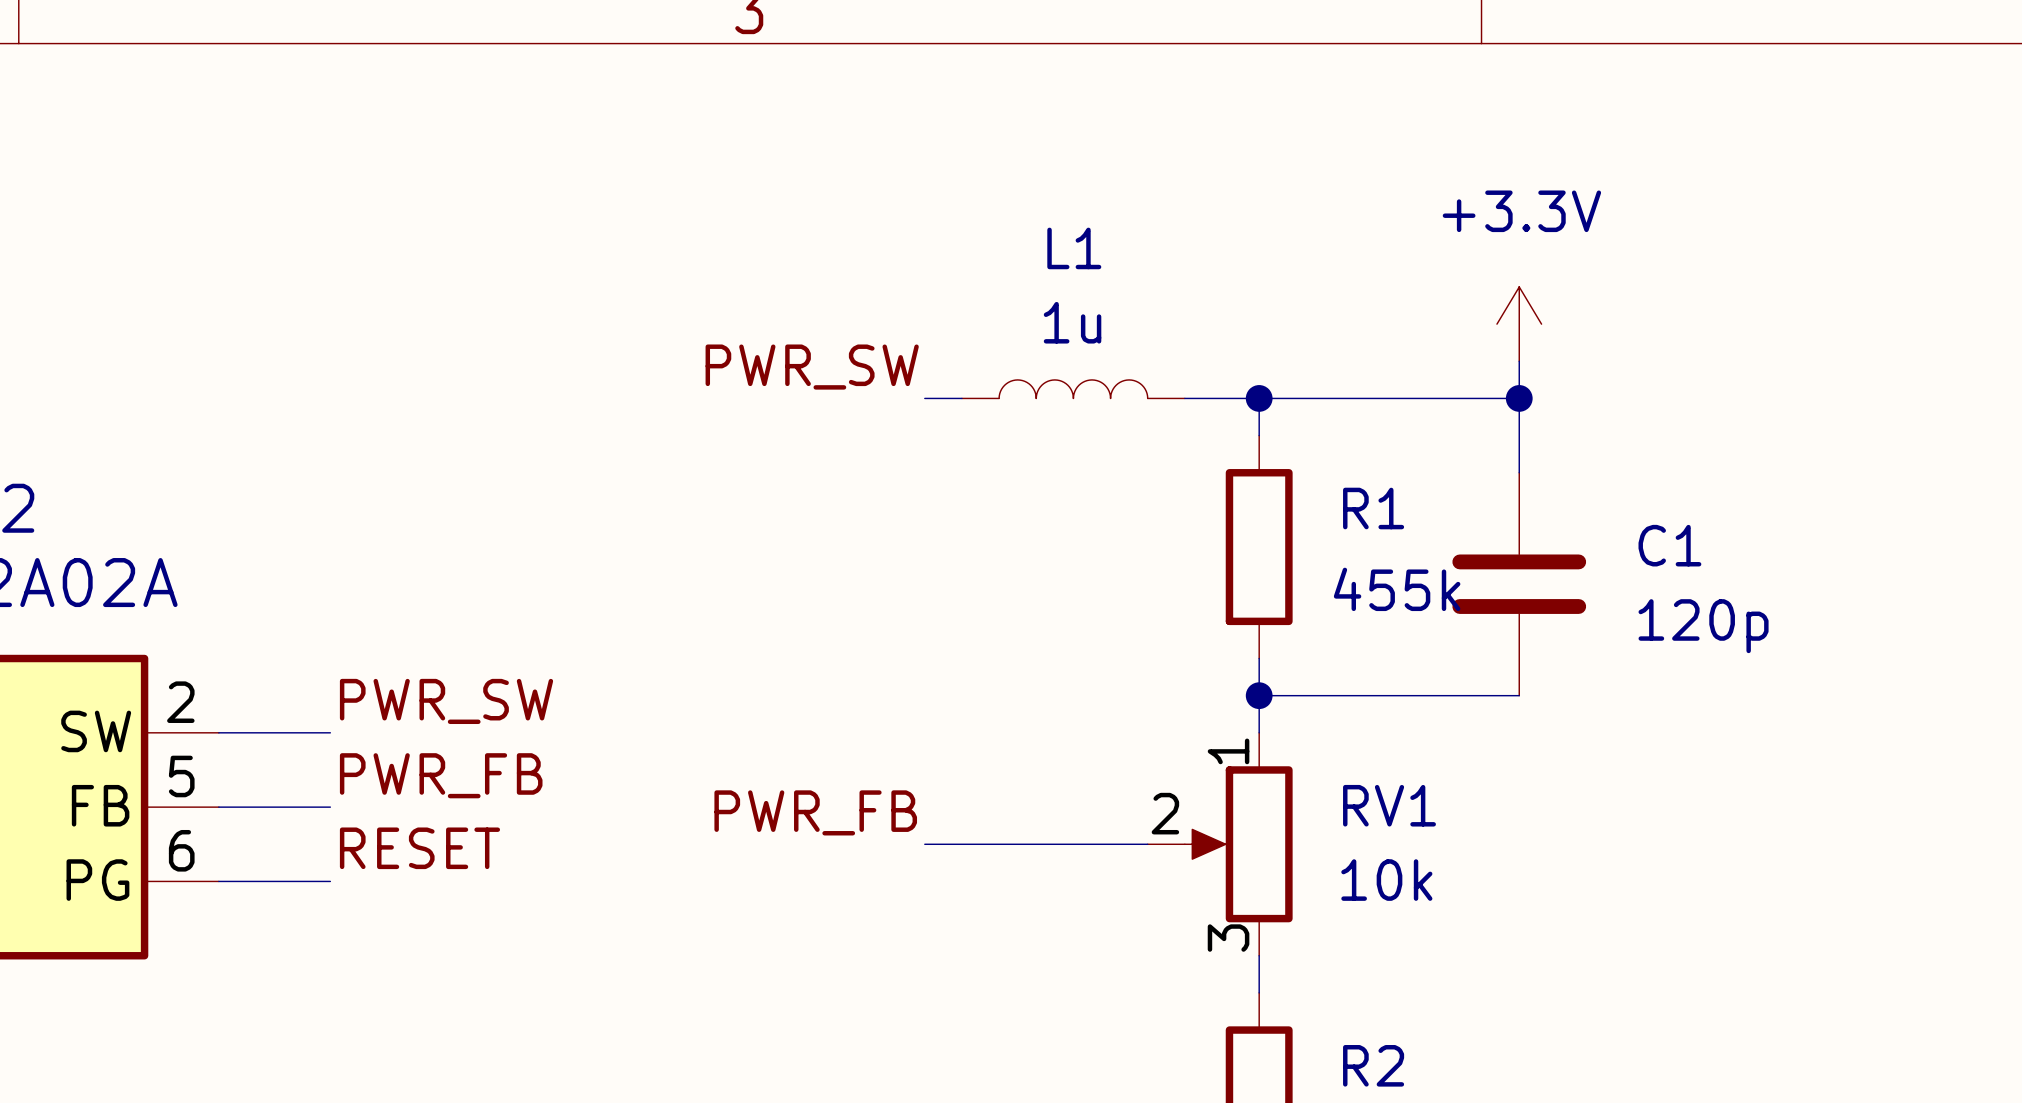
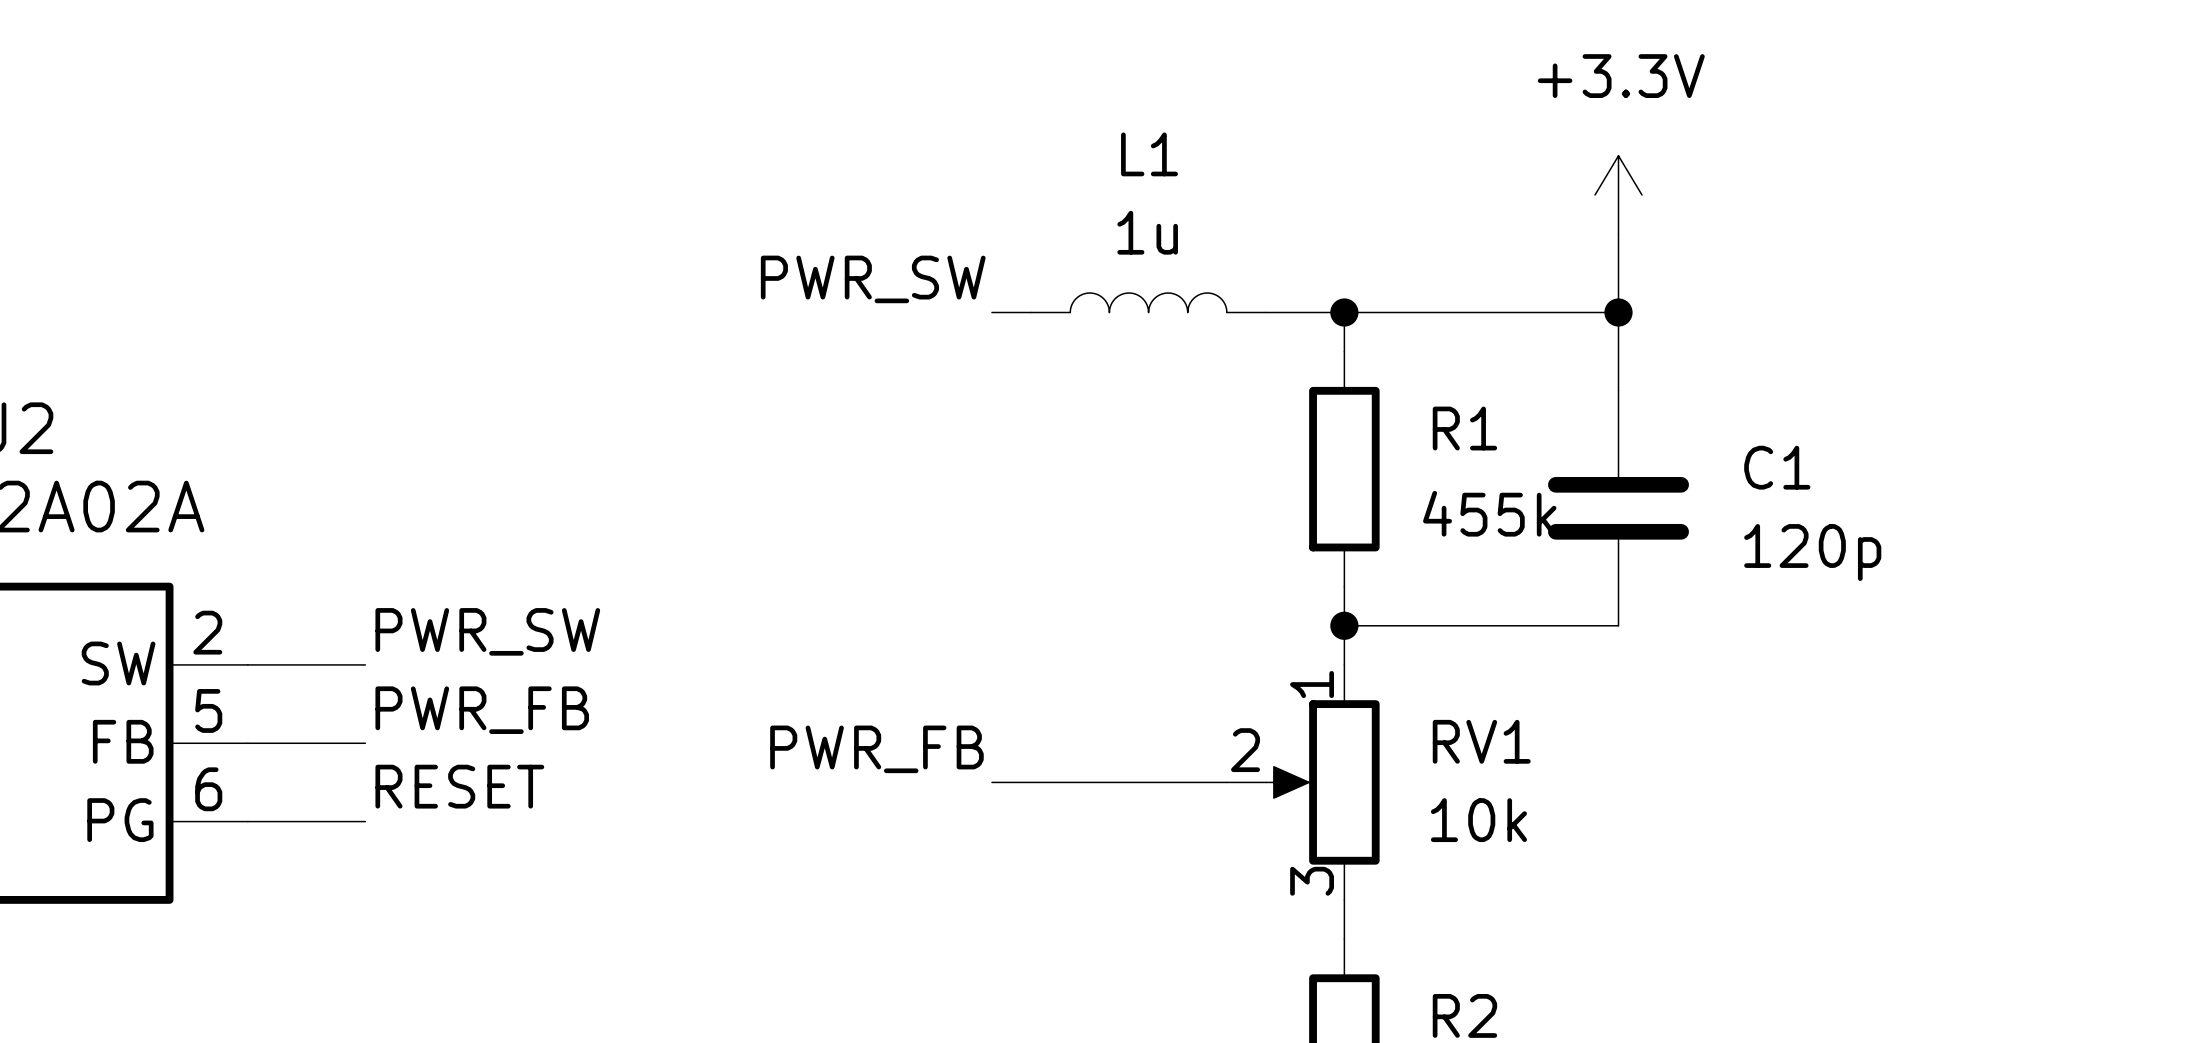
power symbol position: +3.3V (1519, 324) -> +3.3V (1618, 195)

